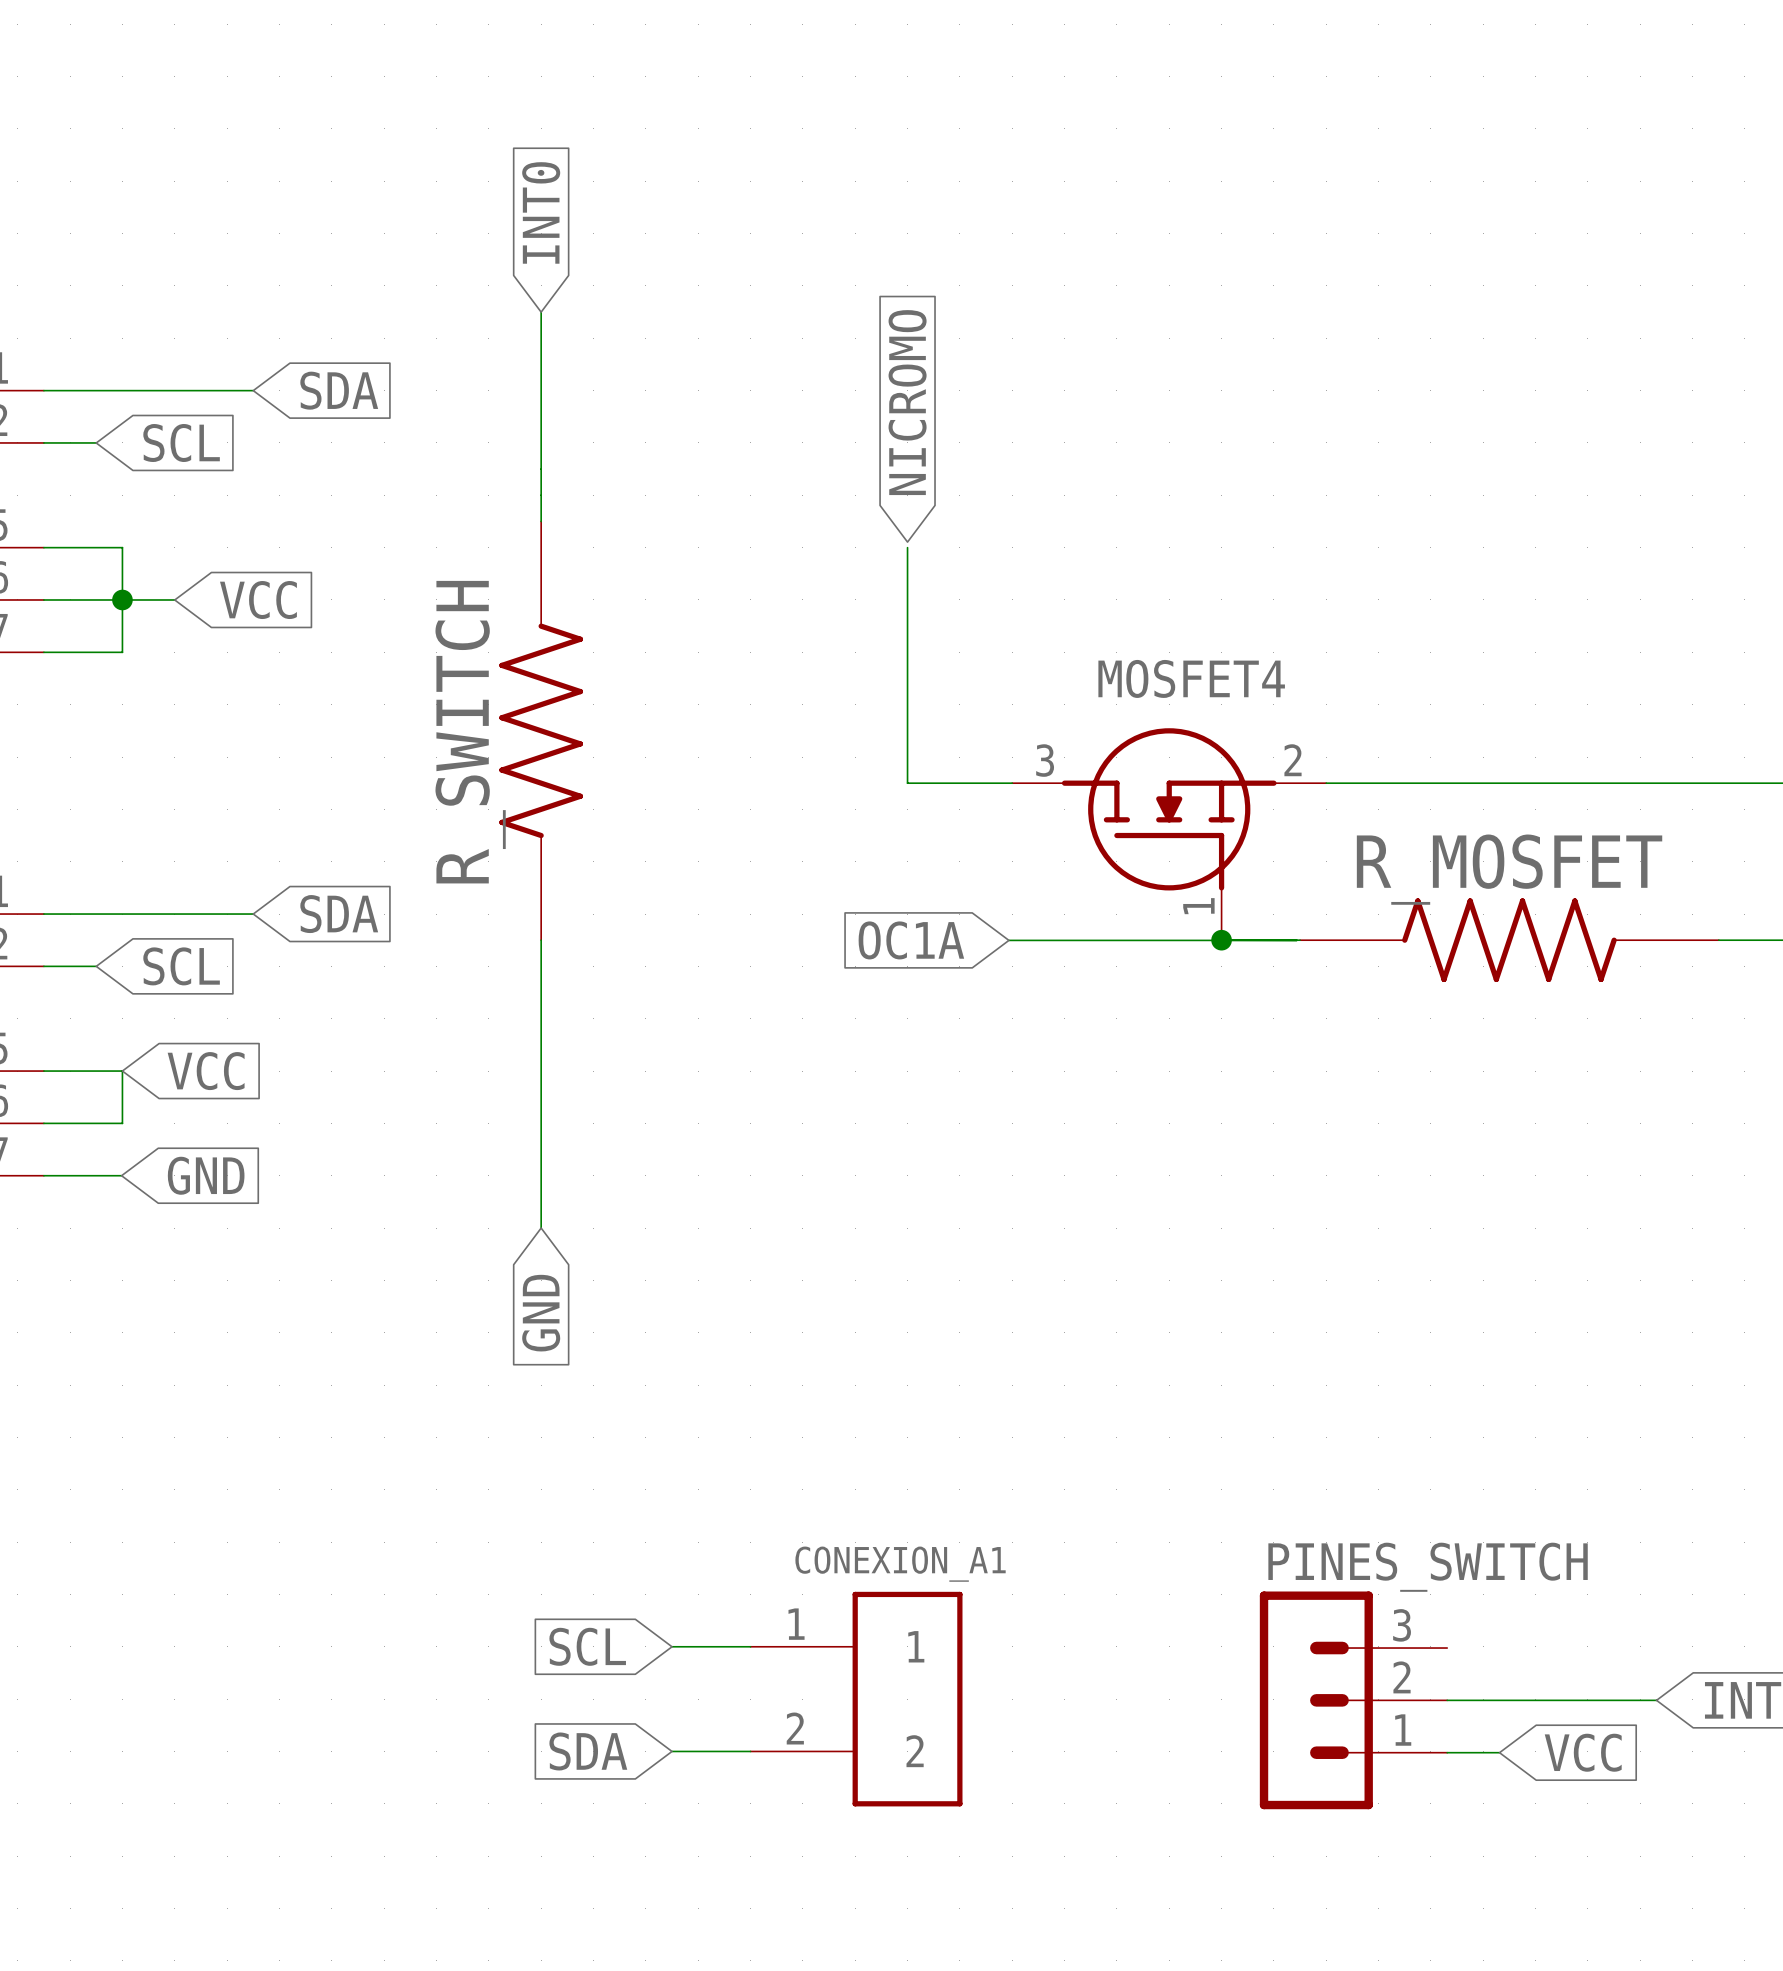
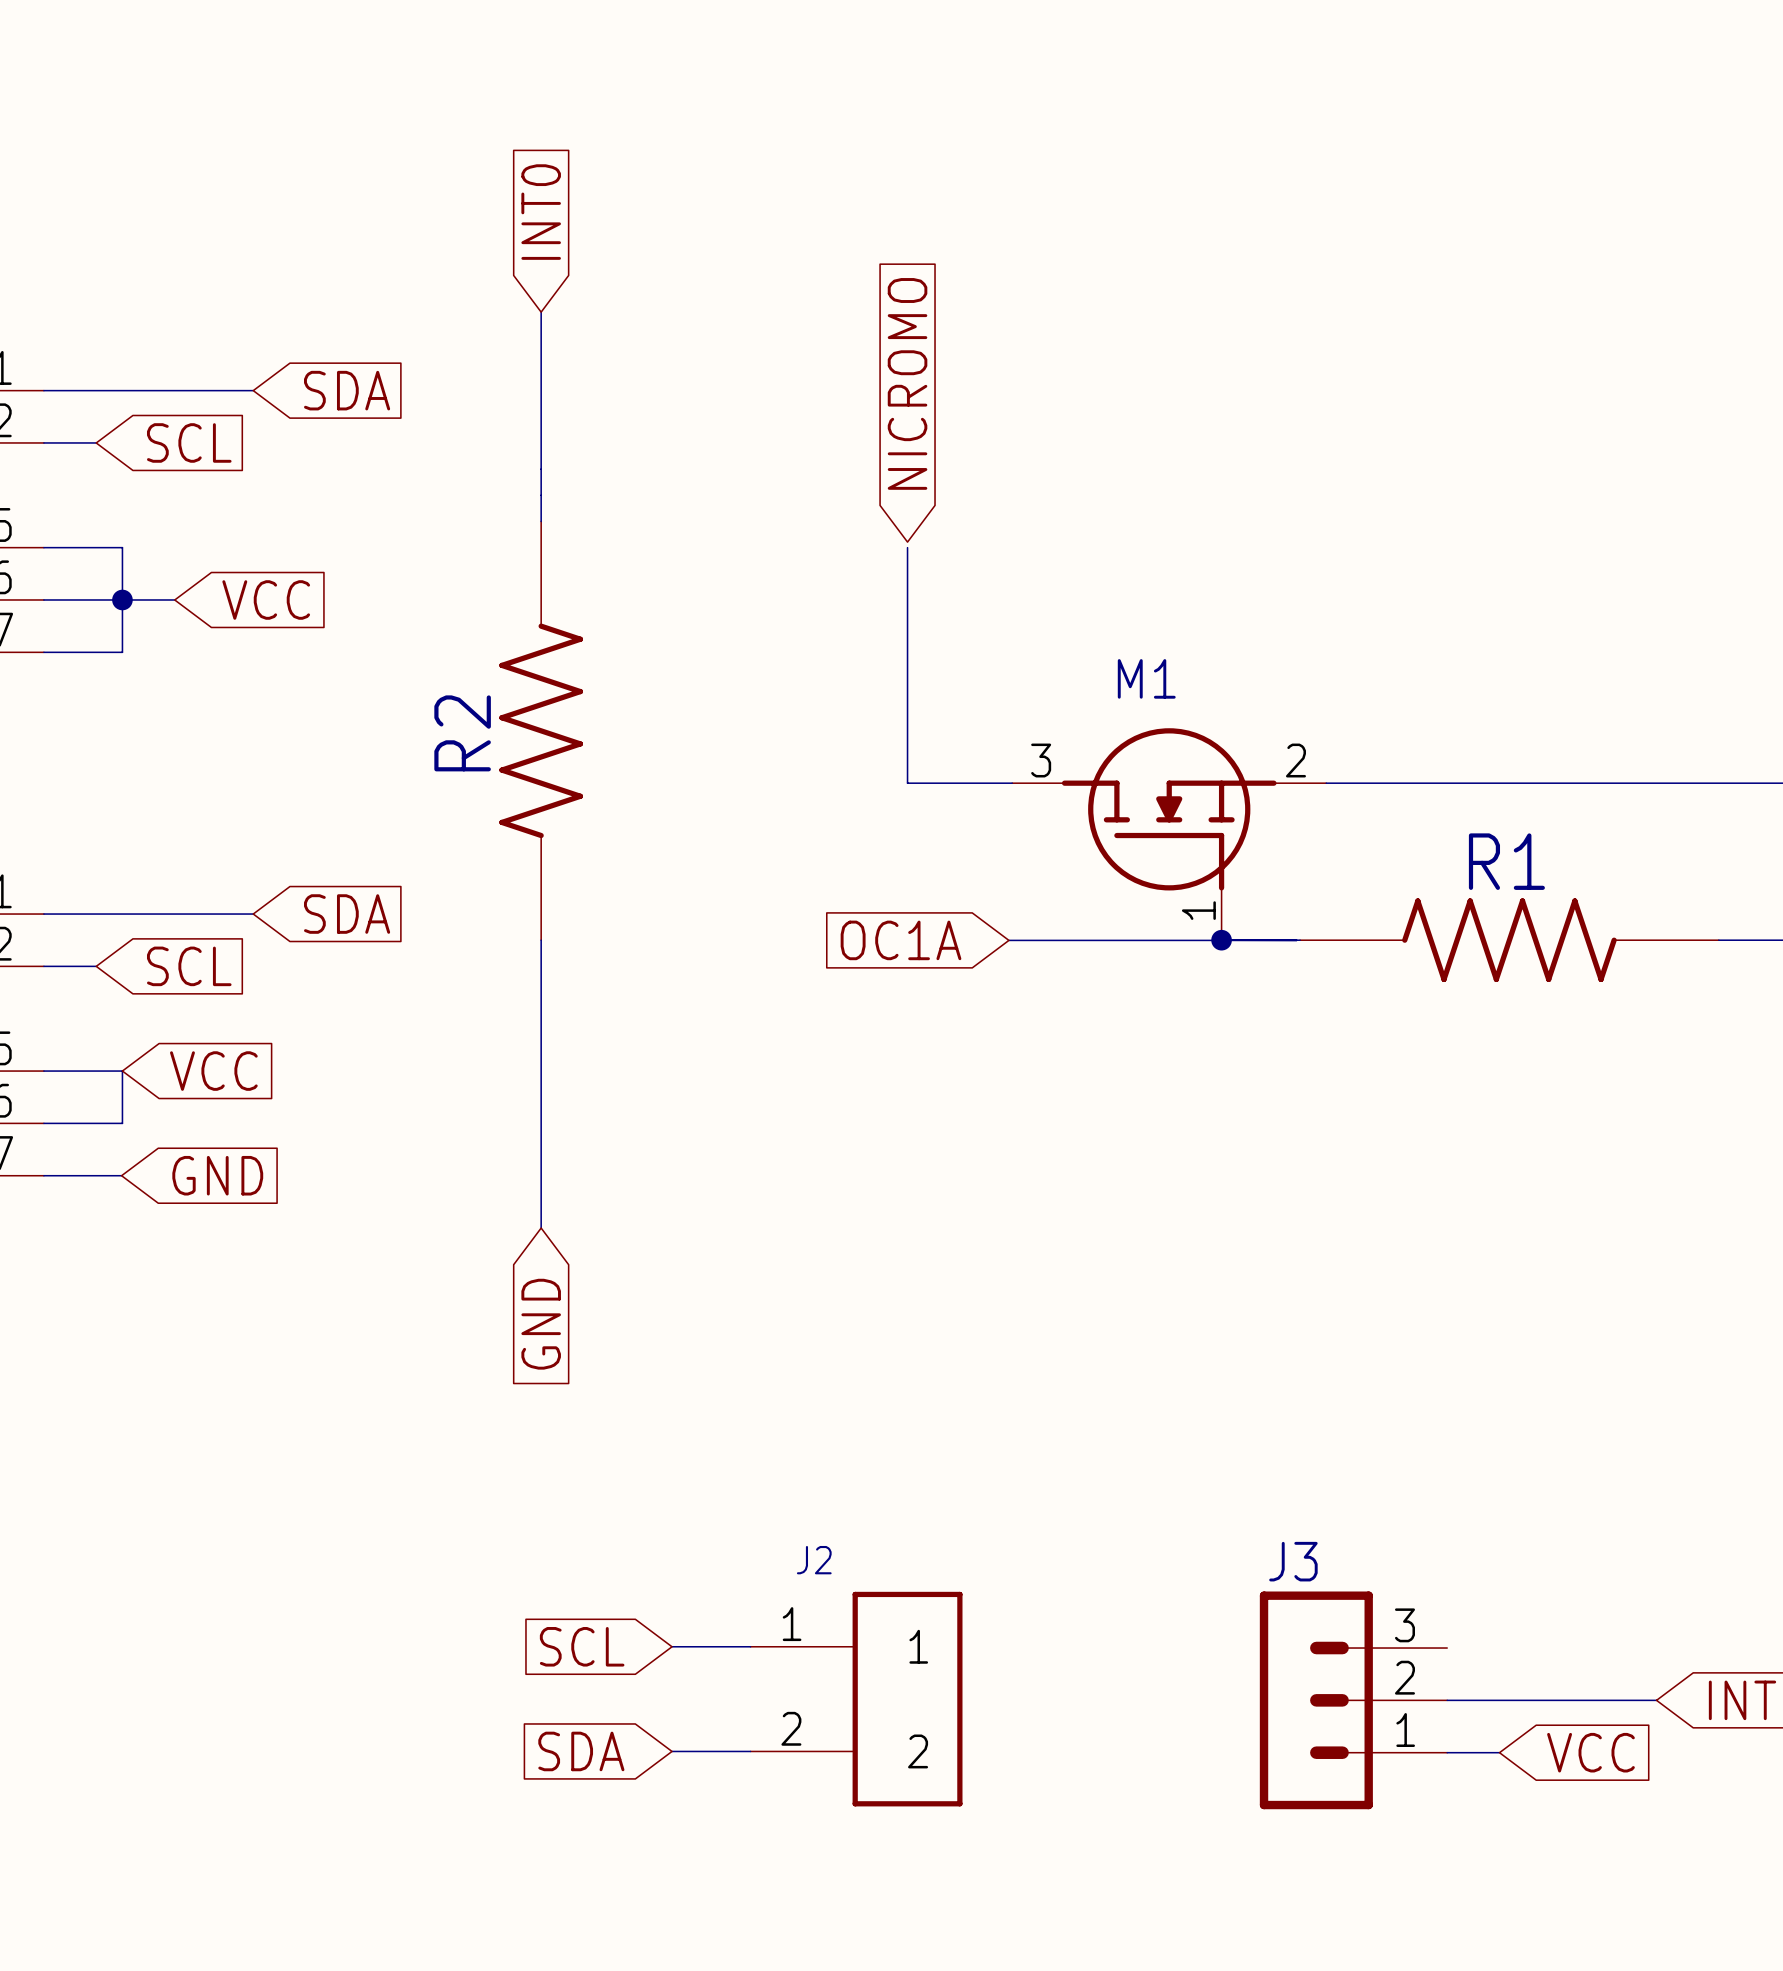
MOSFET4 name: MOSFET4 (1191, 678) -> M1 (1146, 678)
R_SWITCH name: R_SWITCH (470, 732) -> R2 (462, 733)
R_MOSFET name: R_MOSFET (1509, 869) -> R1 (1506, 861)
CONEXION_A1 name: CONEXION_A1 (900, 1564) -> J2 (814, 1560)
PINES_SWITCH name: PINES_SWITCH (1428, 1567) -> J3 (1293, 1561)

